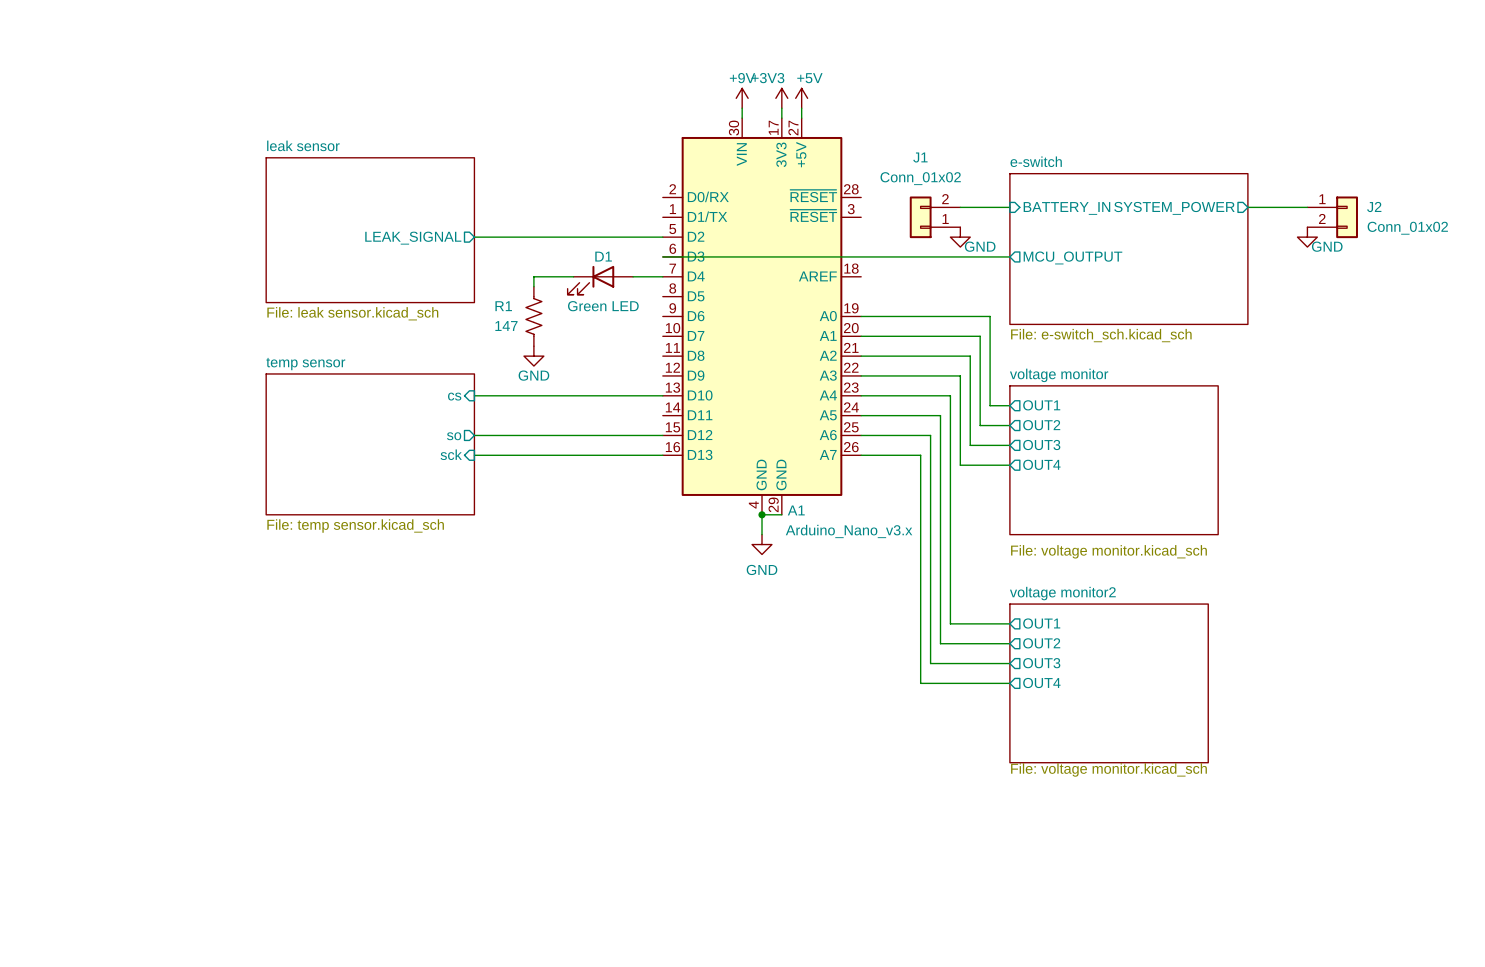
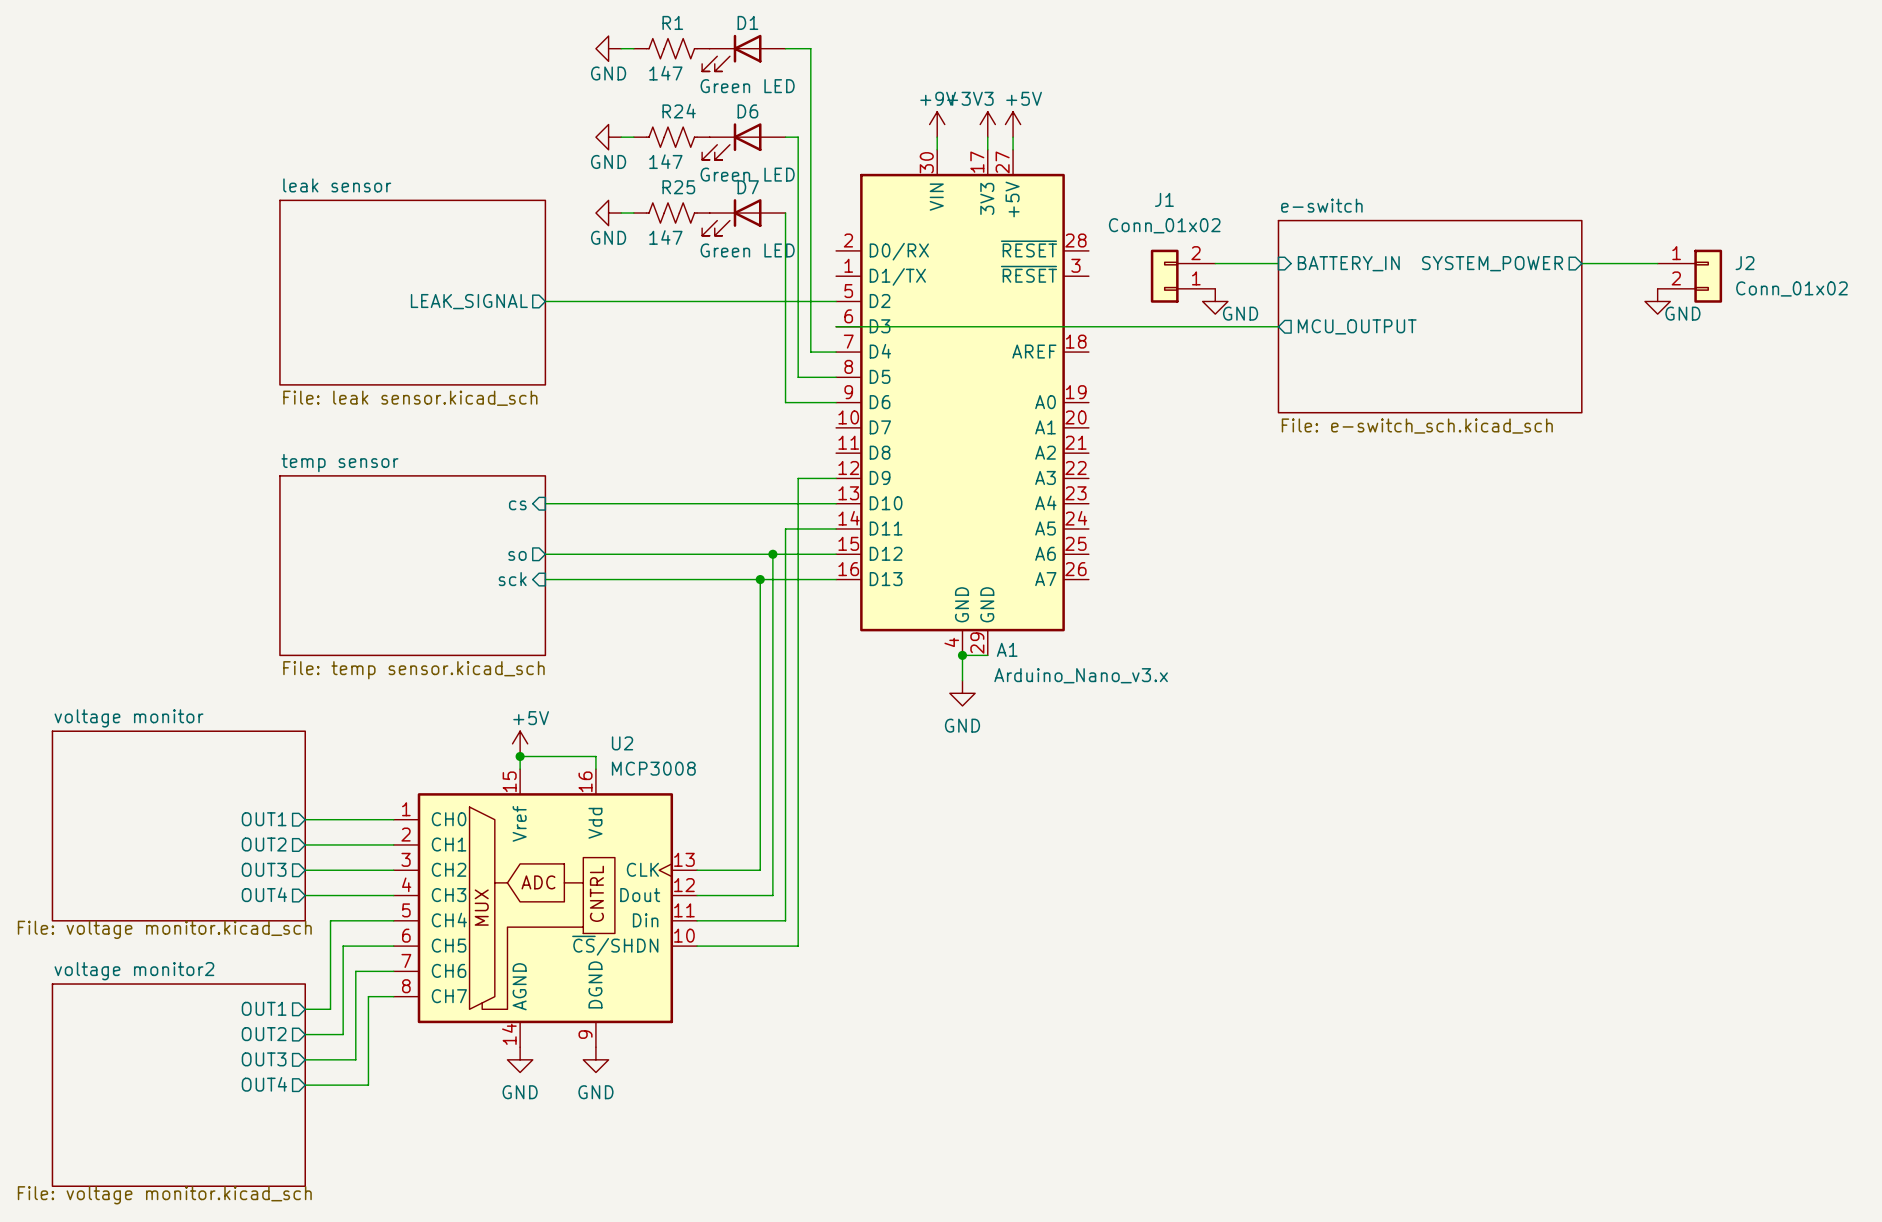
power symbol: none -> GND (608, 48)
wire: none -> (621, 48) (633, 48)
power symbol: none -> GND (608, 137)
wire: none -> (621, 137) (633, 137)
R24: none -> 147 (671, 137)
wire: none -> (785, 137) (798, 137) (798, 377) (836, 377)
D6: none -> Green LED (743, 141)
power symbol: none -> GND (608, 213)
wire: none -> (621, 213) (633, 213)
R25: none -> 147 (671, 213)
wire: none -> (785, 213) (785, 402) (836, 402)
D7: none -> Green LED (743, 217)
sheet leak sensor position: (370, 230) -> (412, 292)
wire: none -> (545, 301) (595, 301)
sheet pin position: LEAK_SIGNAL (413, 238) -> LEAK_SIGNAL (469, 301)
wire: (573, 276) (533, 276) (533, 286) -> none
wire: (633, 276) (643, 276) -> (785, 48) (810, 48) (810, 352)
D1 position: (600, 280) -> (743, 53)
R1 rotation: 0° (533, 316) -> 90° clockwise (671, 48)
R1 position: (533, 316) -> (671, 48)
wire: (861, 316) (990, 316) (990, 405) (1009, 405) -> none
R1 value position: 147 (506, 326) -> 147 (665, 73)
wire: (861, 336) (980, 336) (980, 425) (1009, 425) -> none
power symbol: GND (533, 356) -> none
wire: (861, 356) (970, 356) (970, 445) (1009, 445) -> none
wire: none -> (836, 478) (798, 478) (798, 946) (697, 946)
wire: (861, 375) (960, 375) (960, 465) (1009, 465) -> none
wire: none -> (545, 503) (595, 503)
wire: (861, 395) (950, 395) (950, 623) (1009, 623) -> none
sheet pin position: cs (454, 396) -> cs (517, 505)
sheet pin: OUT1 (1041, 405) -> none
wire: none -> (836, 528) (785, 528) (785, 920) (697, 920)
wire: (861, 415) (940, 415) (940, 643) (1009, 643) -> none
sheet pin: OUT2 (1041, 425) -> none
wire: none -> (545, 554) (595, 554)
wire: none -> (772, 554) (772, 895) (697, 895)
junction: none -> (772, 554)
wire: (861, 435) (930, 435) (930, 663) (1009, 663) -> none
sheet pin position: so (454, 436) -> so (517, 555)
sheet temp sensor position: (370, 444) -> (412, 565)
sheet pin: OUT3 (1041, 445) -> none
sheet pin position: sck (451, 454) -> sck (512, 579)
wire: none -> (545, 579) (595, 579)
wire: none -> (760, 579) (760, 870) (697, 870)
junction: none -> (760, 579)
wire: (861, 455) (920, 455) (920, 683) (1009, 683) -> none
sheet voltage monitor: File: voltage monitor.kicad_sch (1114, 460) -> none
sheet pin: OUT4 (1041, 464) -> none
power symbol: none -> +5V (520, 743)
junction: none -> (520, 756)
wire: none -> (520, 769) (520, 756) (595, 756) (595, 769)
sheet pin: OUT1 (1041, 623) -> none
sheet pin: none -> OUT1 (264, 819)
wire: none -> (305, 819) (393, 819)
sheet pin: OUT2 (1041, 643) -> none
sheet voltage monitor: none -> File: voltage monitor.kicad_sch (178, 826)
sheet pin: none -> OUT2 (264, 844)
wire: none -> (305, 844) (393, 844)
sheet pin: OUT3 (1041, 663) -> none
sheet pin: none -> OUT3 (264, 869)
wire: none -> (305, 870) (393, 870)
sheet pin: OUT4 (1041, 683) -> none
sheet voltage monitor2 position: (1109, 683) -> (178, 1085)
sheet pin: none -> OUT4 (264, 894)
wire: none -> (305, 895) (393, 895)
U2: none -> MCP3008 (545, 908)
wire: none -> (393, 920) (330, 920) (330, 1009) (305, 1009)
wire: none -> (393, 946) (343, 946) (343, 1034) (305, 1034)
wire: none -> (393, 971) (355, 971) (355, 1059) (305, 1059)
sheet voltage monitor2 value position: File: voltage monitor.kicad_sch (1108, 769) -> File: voltage monitor.kicad_sch (164, 1195)
wire: none -> (393, 996) (368, 996) (368, 1085) (305, 1085)
sheet pin: none -> OUT1 (264, 1008)
sheet pin: none -> OUT2 (264, 1034)
sheet pin: none -> OUT3 (264, 1059)
power symbol: none -> GND (520, 1059)
power symbol: none -> GND (595, 1059)
sheet pin: none -> OUT4 (264, 1084)

